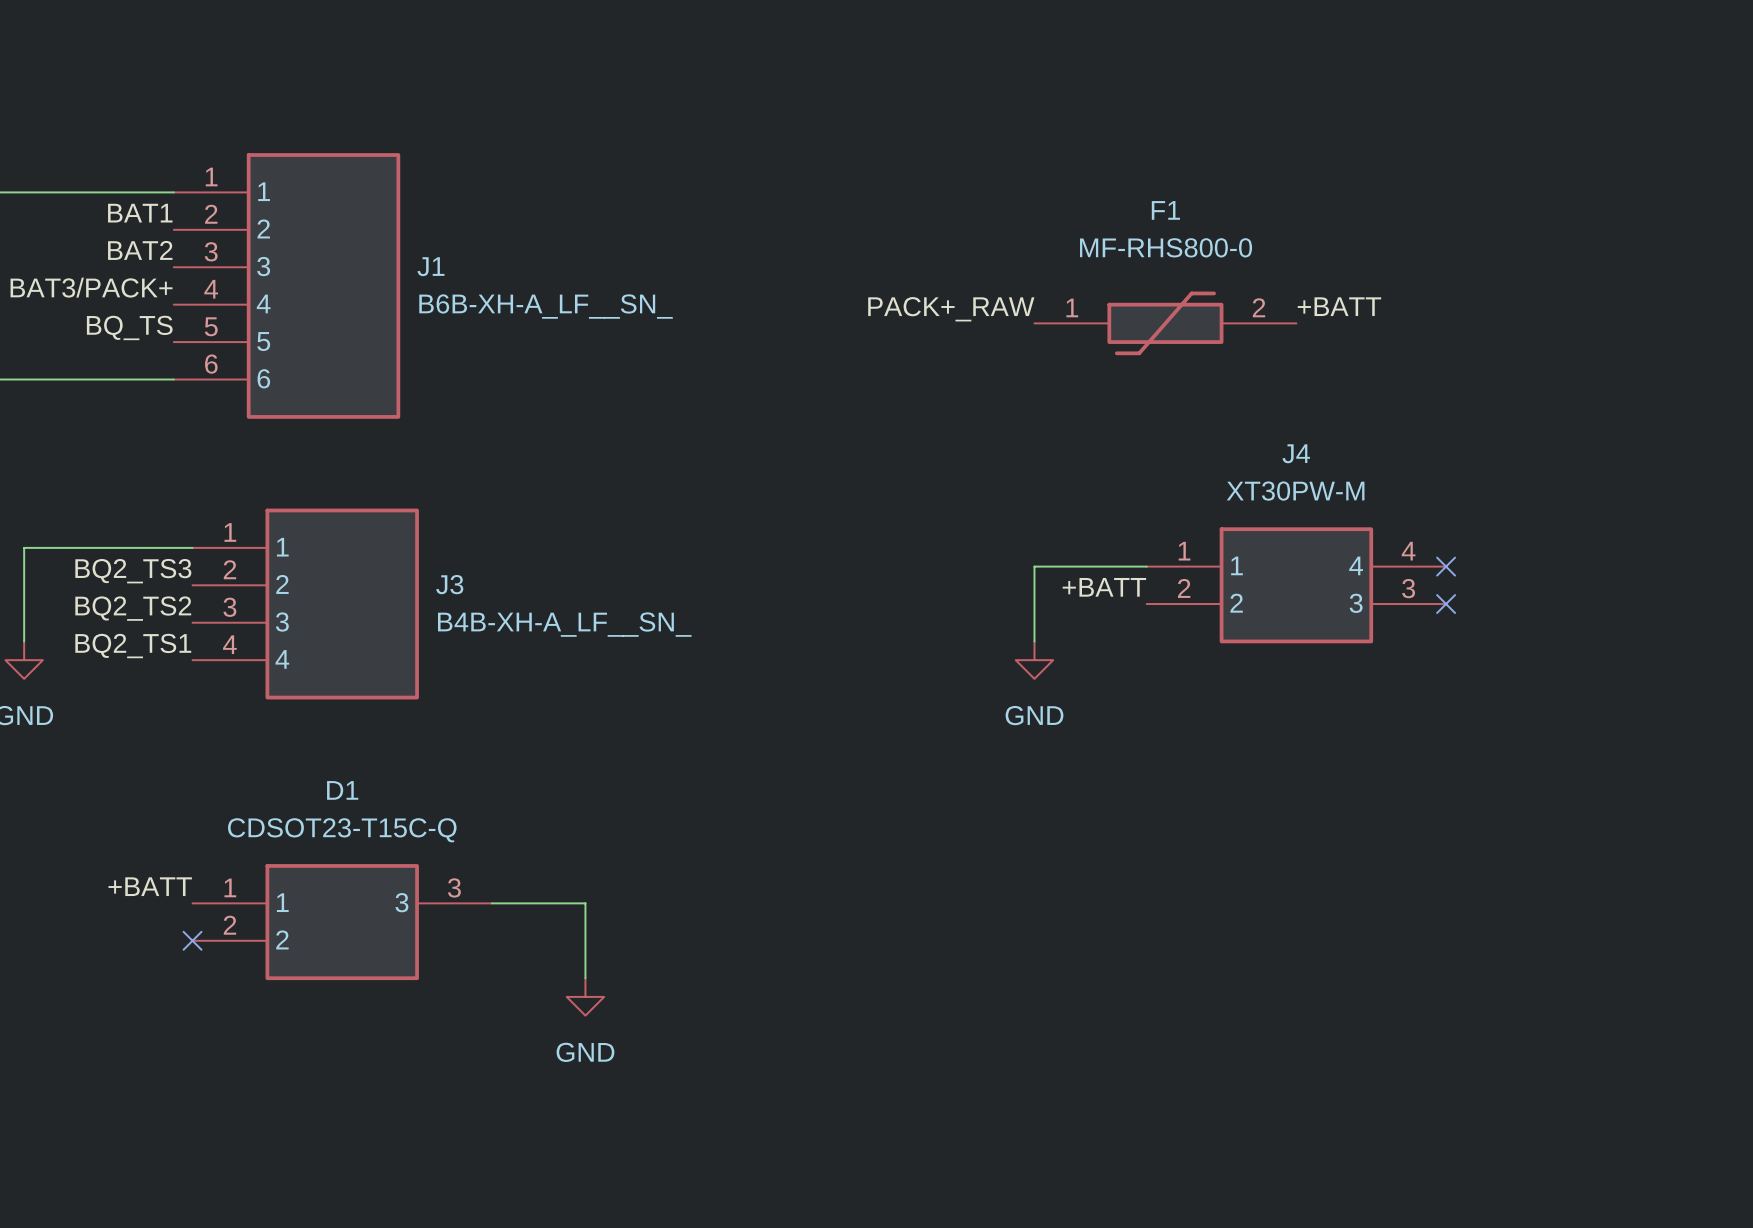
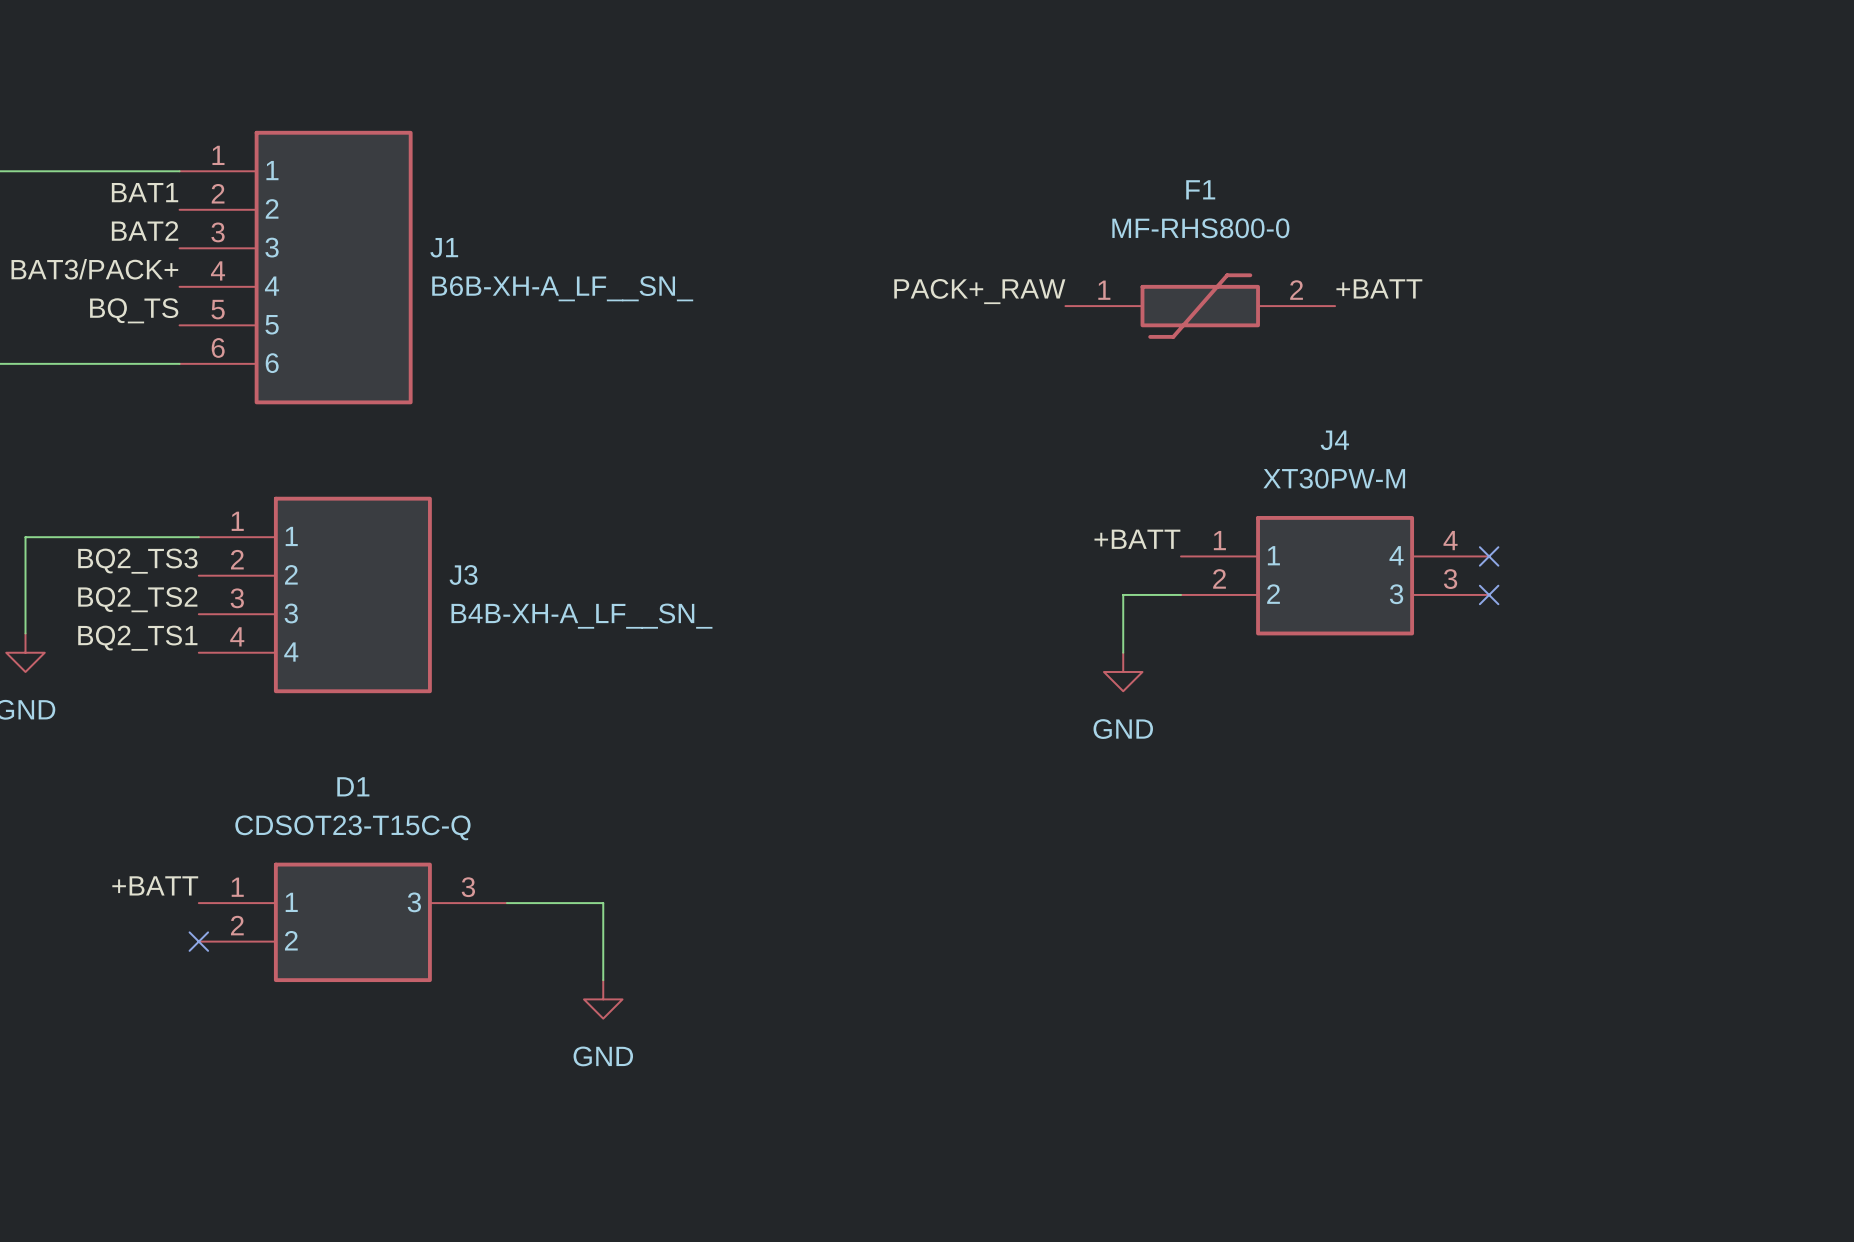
wire: (1146, 566) (1034, 566) (1034, 641) -> none
label position: +BATT (1104, 587) -> +BATT (1137, 539)
wire: none -> (1181, 594) (1123, 594) (1123, 652)
power symbol position: GND (1034, 660) -> GND (1123, 671)

